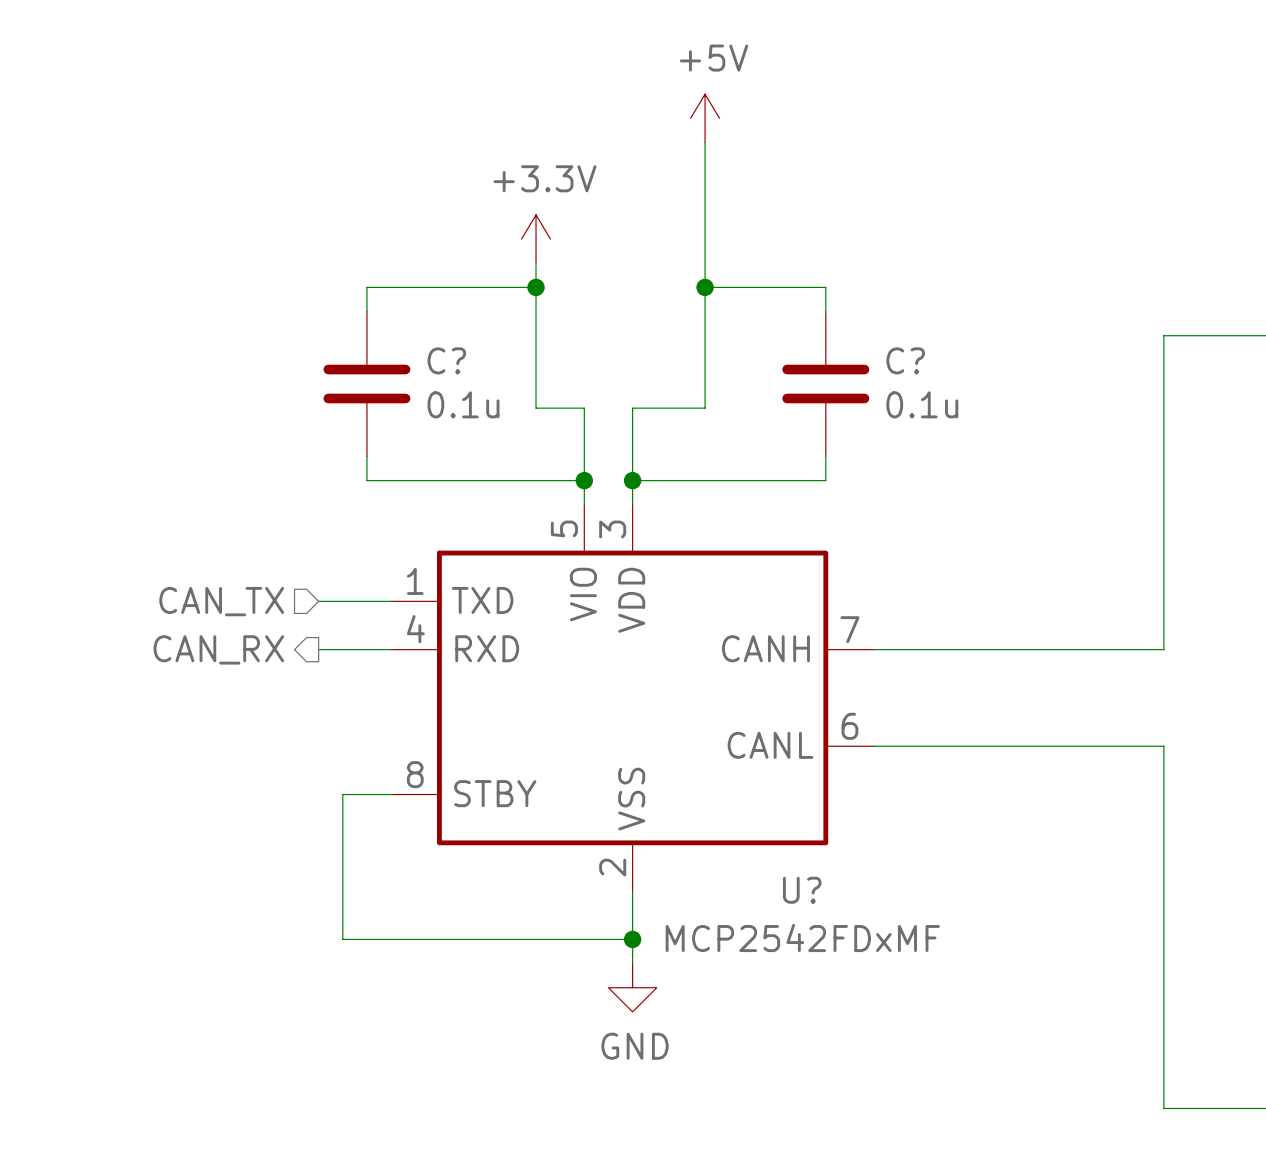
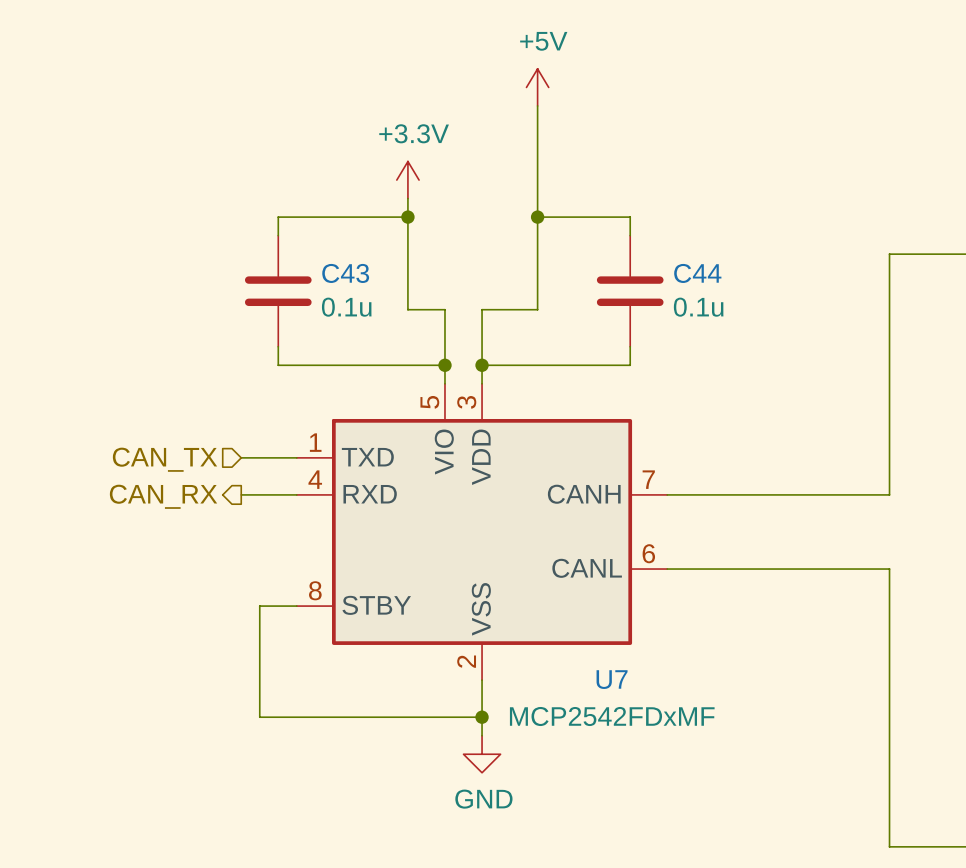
C? name: C? (446, 360) -> C43 (345, 273)
C? name: C? (905, 360) -> C44 (697, 273)
U? name: U? (802, 890) -> U7 (612, 679)

